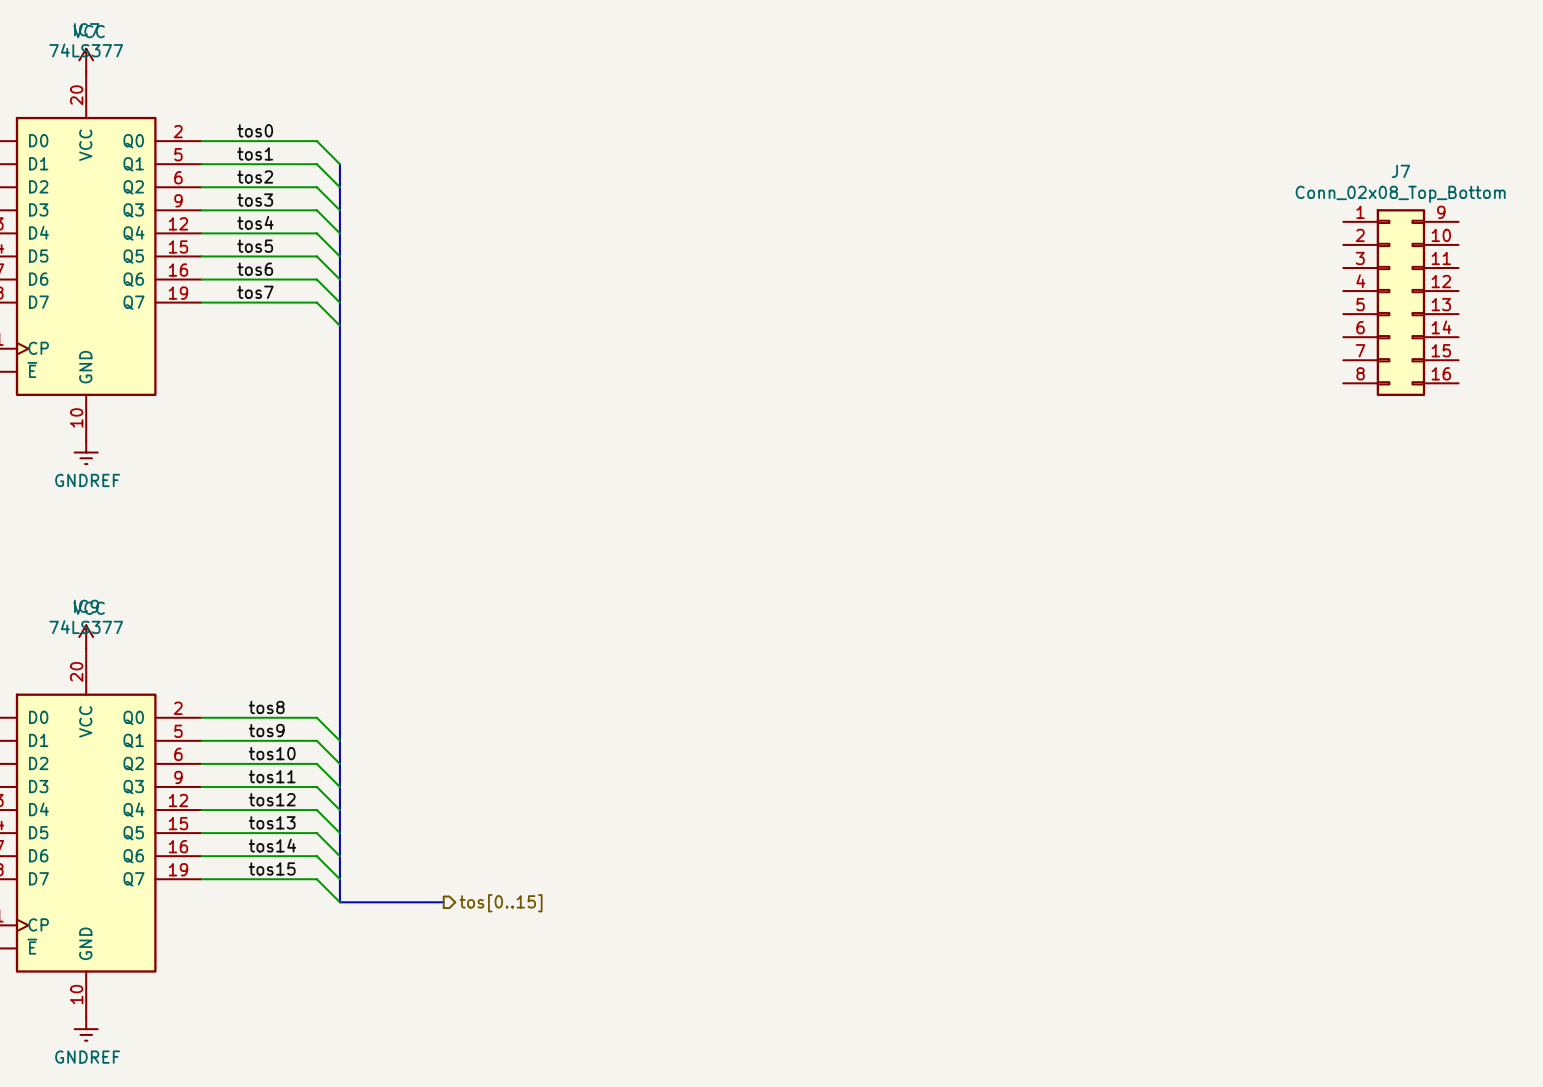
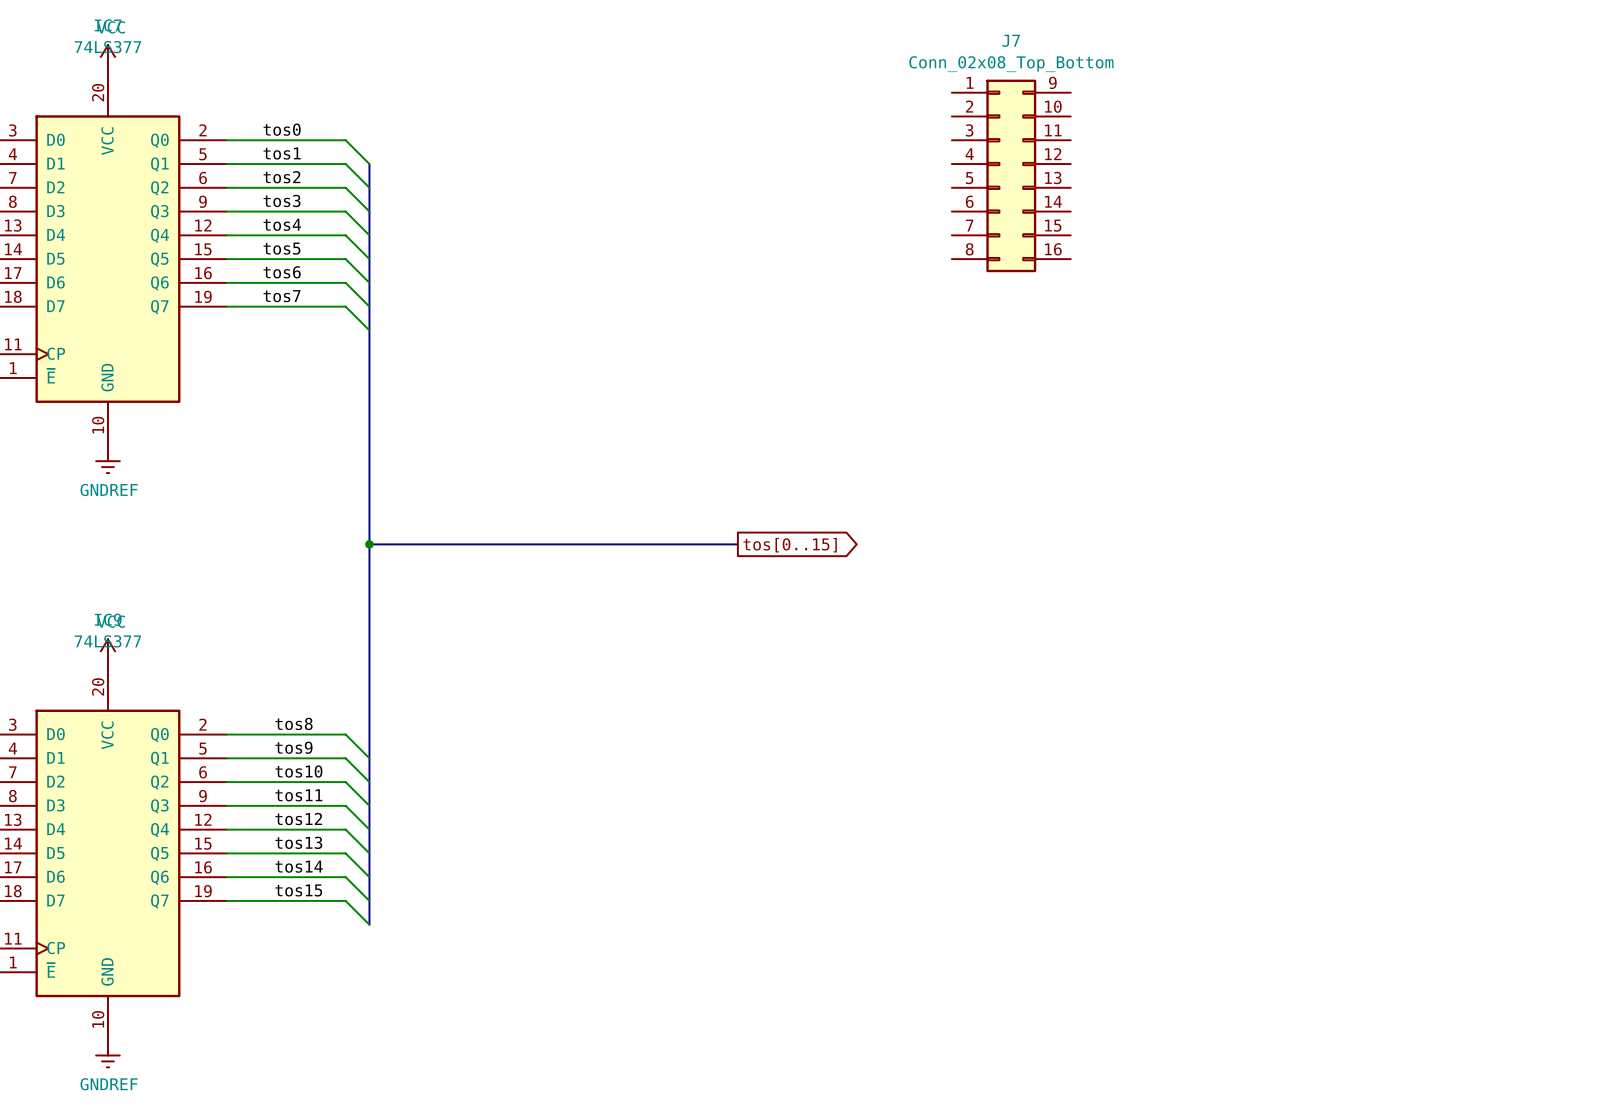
J7 position: (1400, 302) -> (1011, 175)
bus: none -> (369, 544) (737, 544)
junction: none -> (369, 544)
global label: none -> tos[0..15] (790, 545)
bus: (339, 902) (443, 902) -> none
hierarchical label: tos[0..15] (501, 903) -> none

